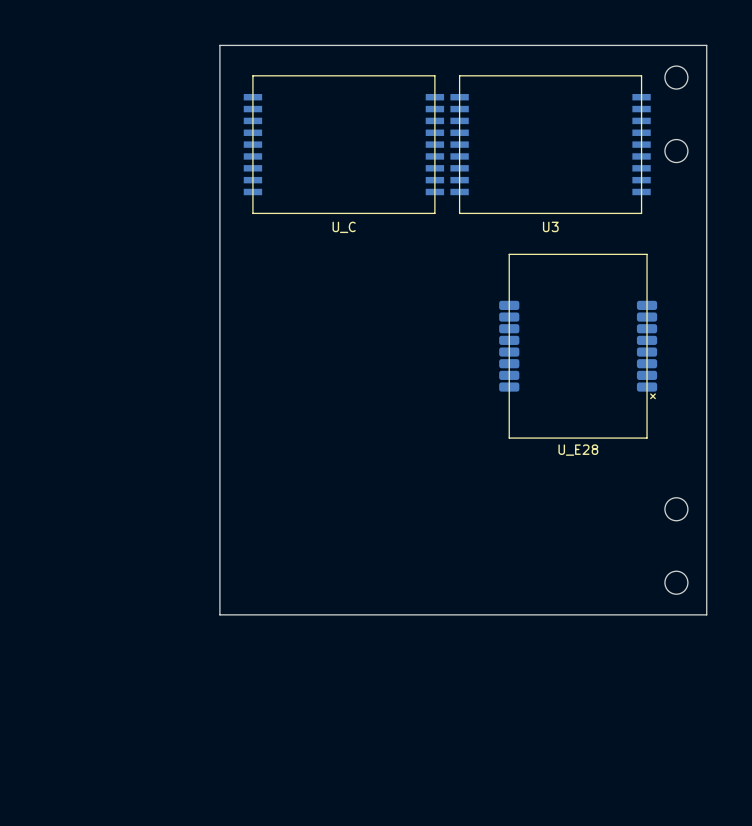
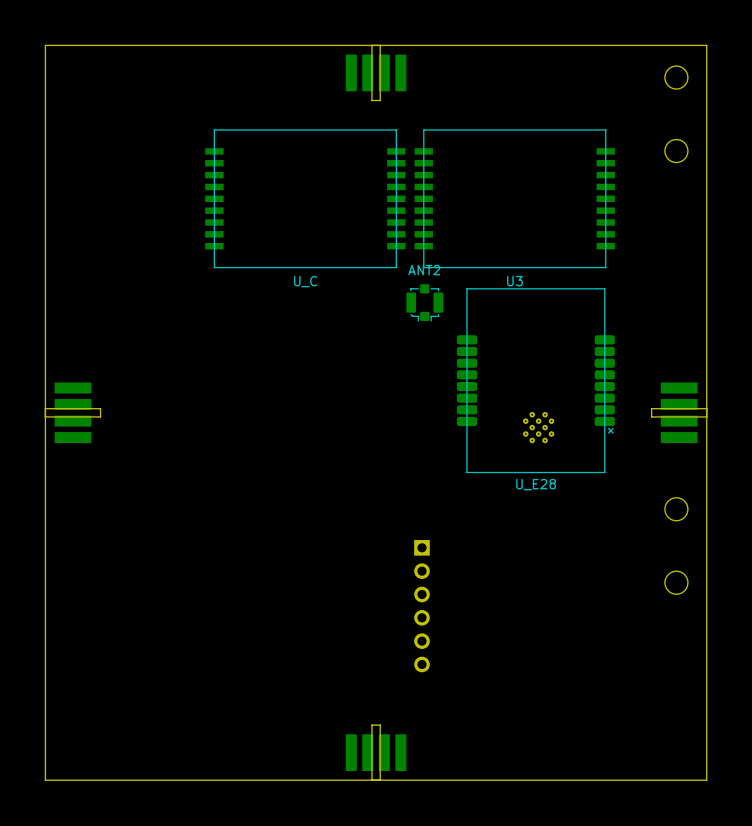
board edge: (219, 45) (219, 614) (706, 614) -> (219, 45) (45, 45) (45, 780) (706, 780) (706, 614)
part: none -> (376, 72)
U_C position: (343, 144) -> (305, 198)
U3 position: (550, 144) -> (514, 198)
ANT2: none -> (424, 302)
U_E28 position: (578, 346) -> (535, 380)
part: none -> (72, 412)
part: none -> (679, 412)
part: none -> (538, 427)
part: none -> (421, 606)
part: none -> (376, 752)

